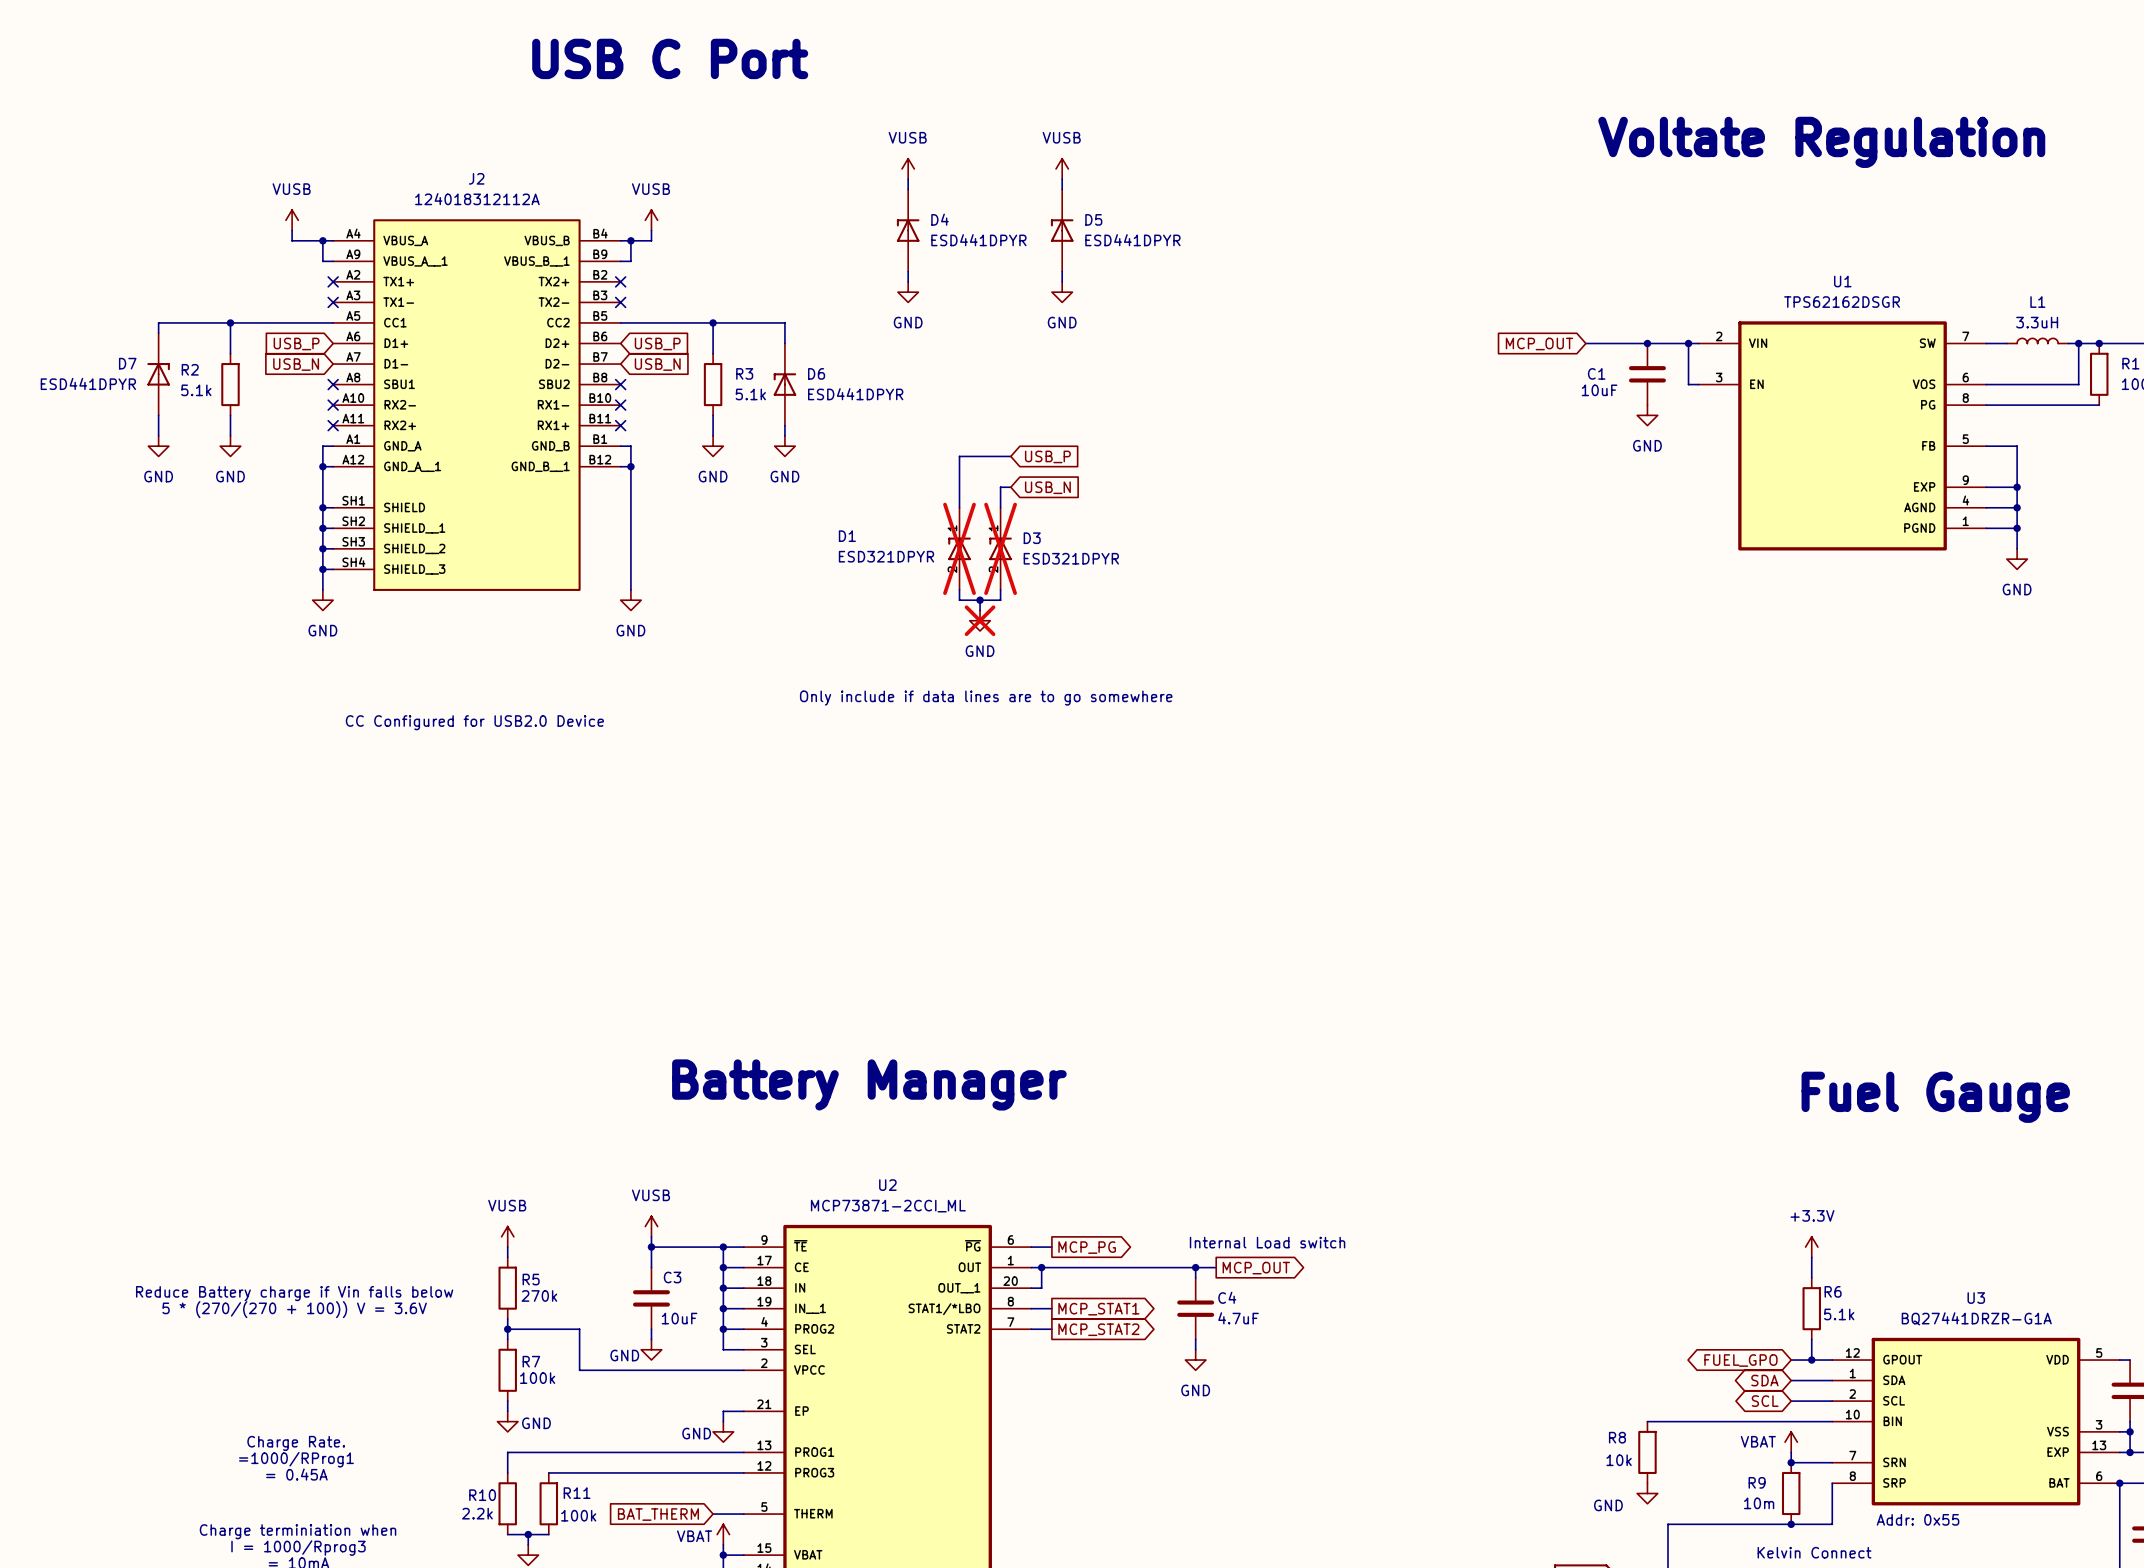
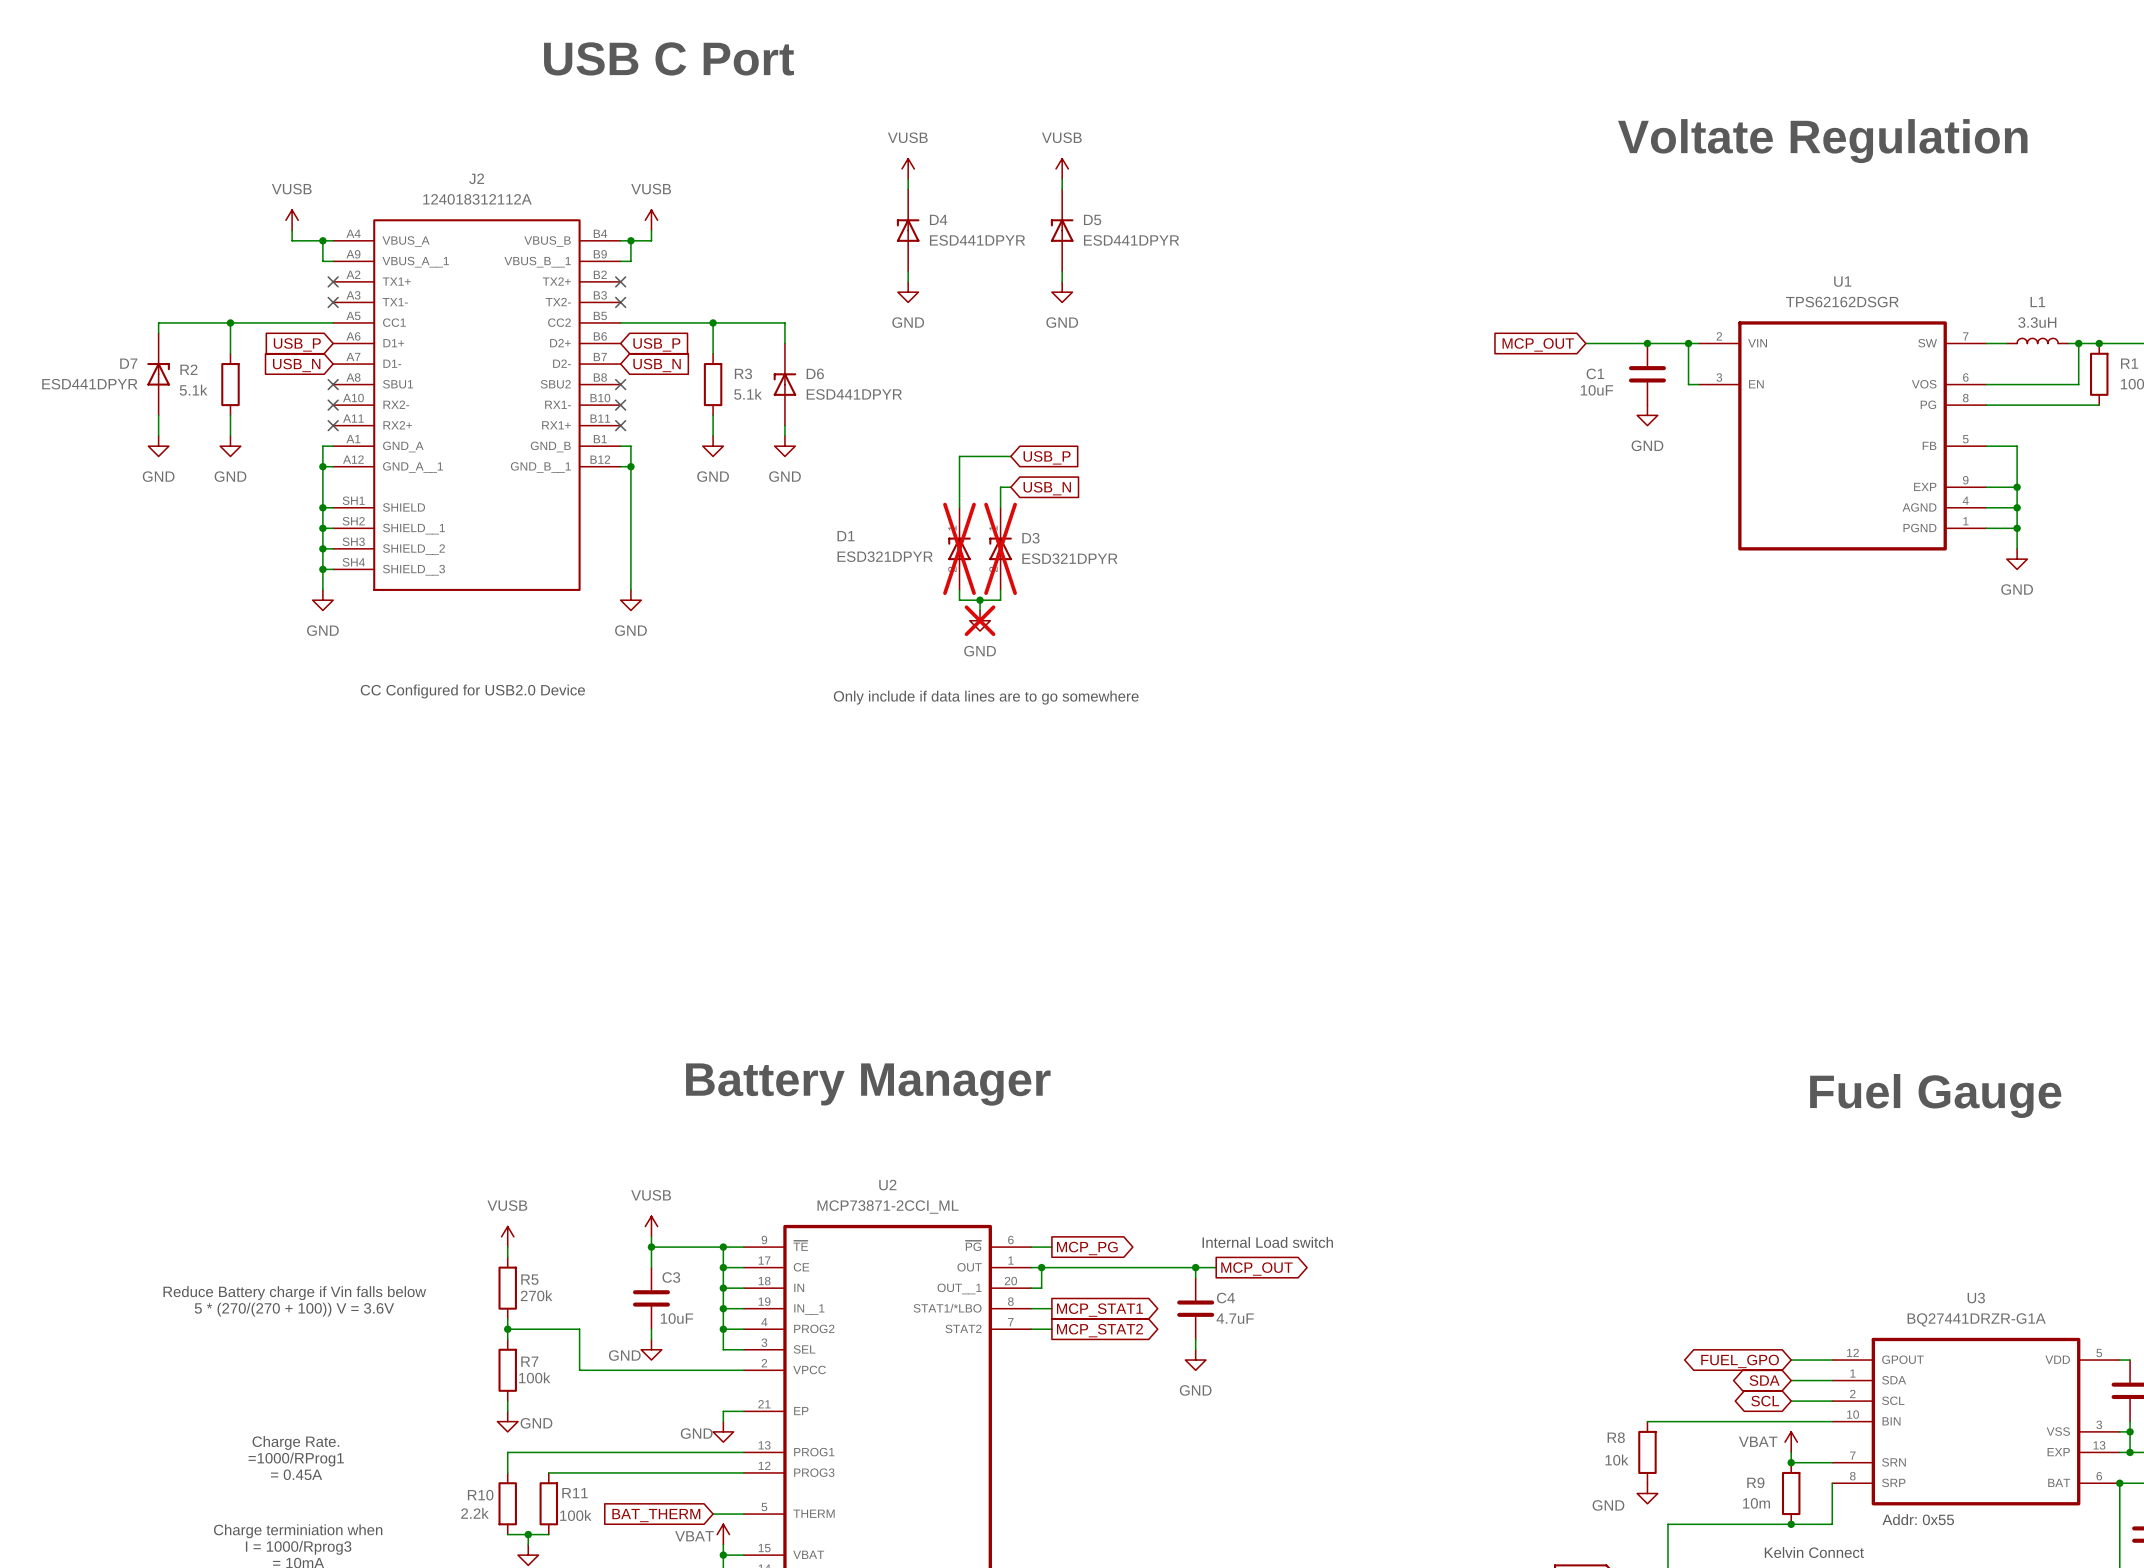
text position: CC Configured for USB2.0 Device (474, 722) -> CC Configured for USB2.0 Device (472, 691)
power symbol: +3.3V (1811, 1247) -> none
wire: (1811, 1257) (1811, 1277) -> none
R6: 5.1k (1811, 1308) -> none
wire: (1811, 1339) (1811, 1360) -> none
junction: (1811, 1360) -> none

